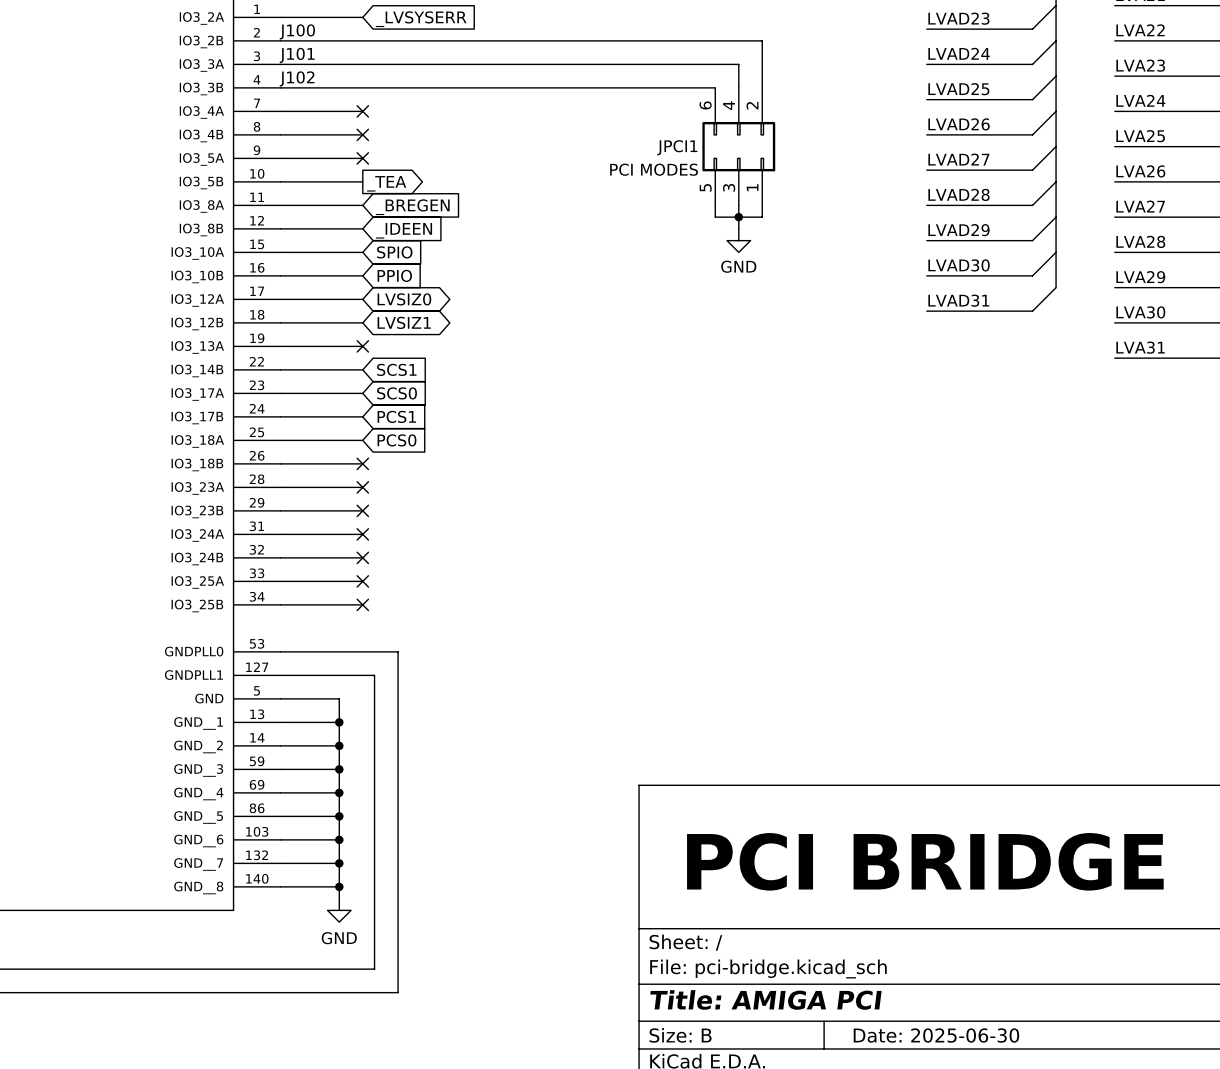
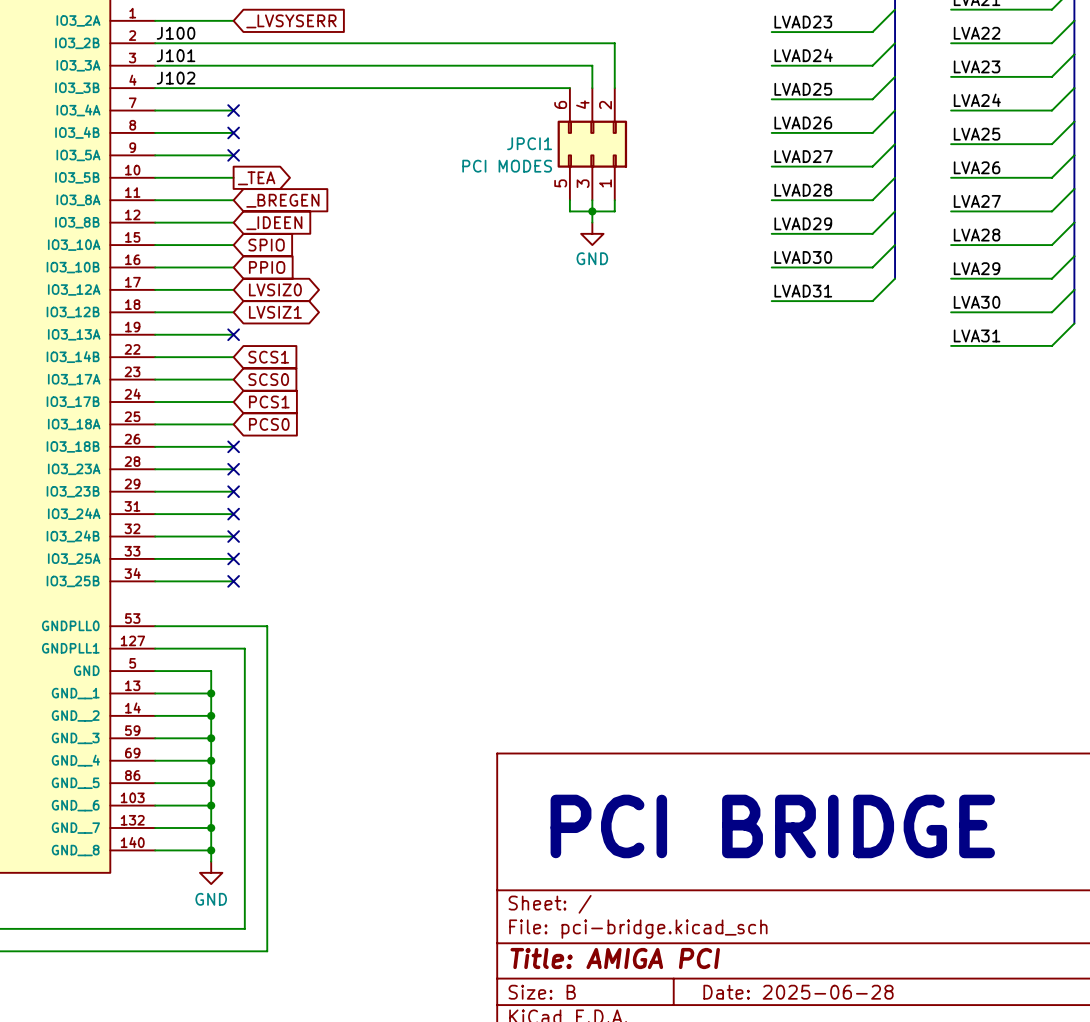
title block: Date: 2025-06-30 (936, 1035) -> Date: 2025-06-28 (798, 992)

